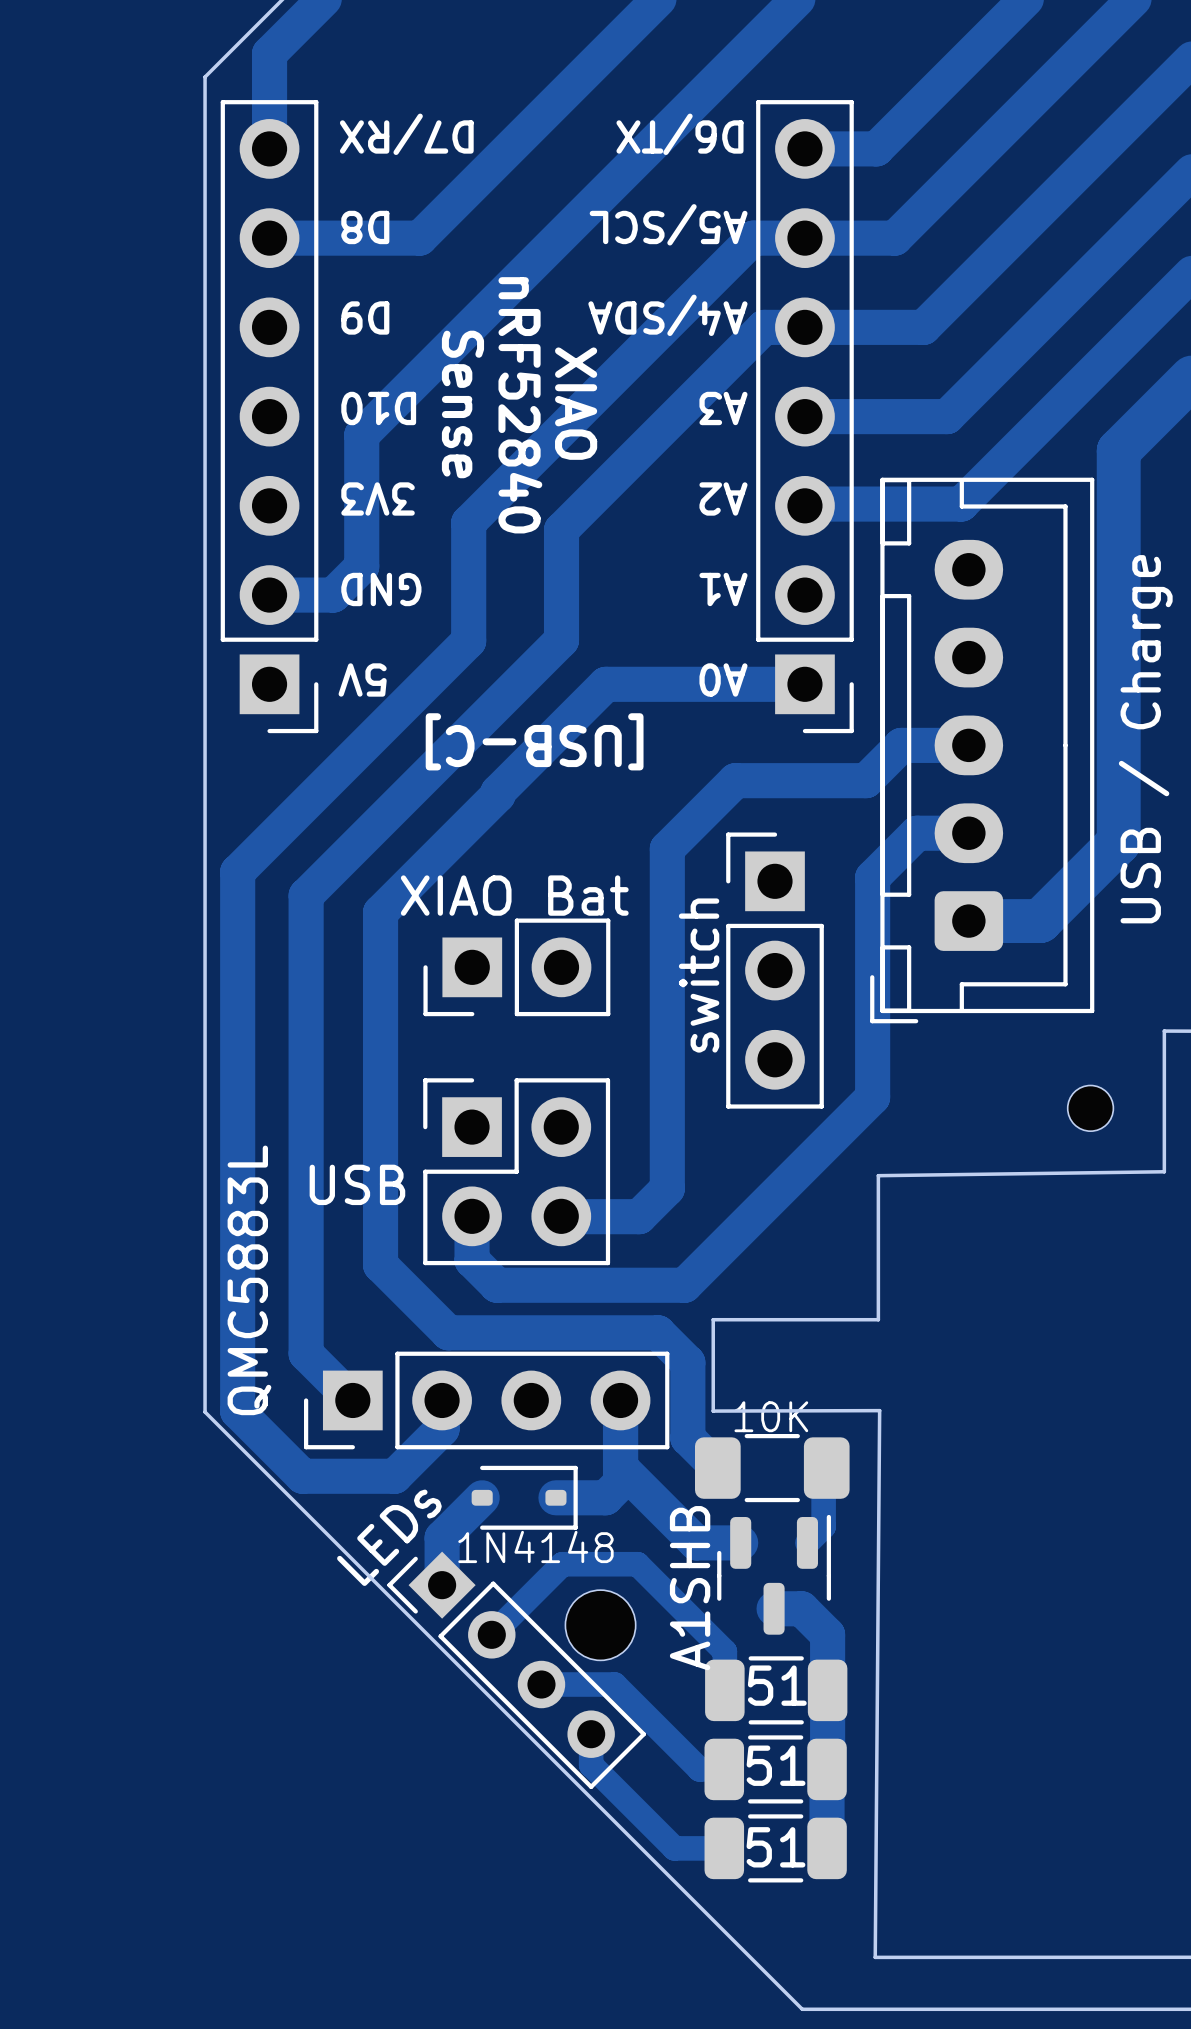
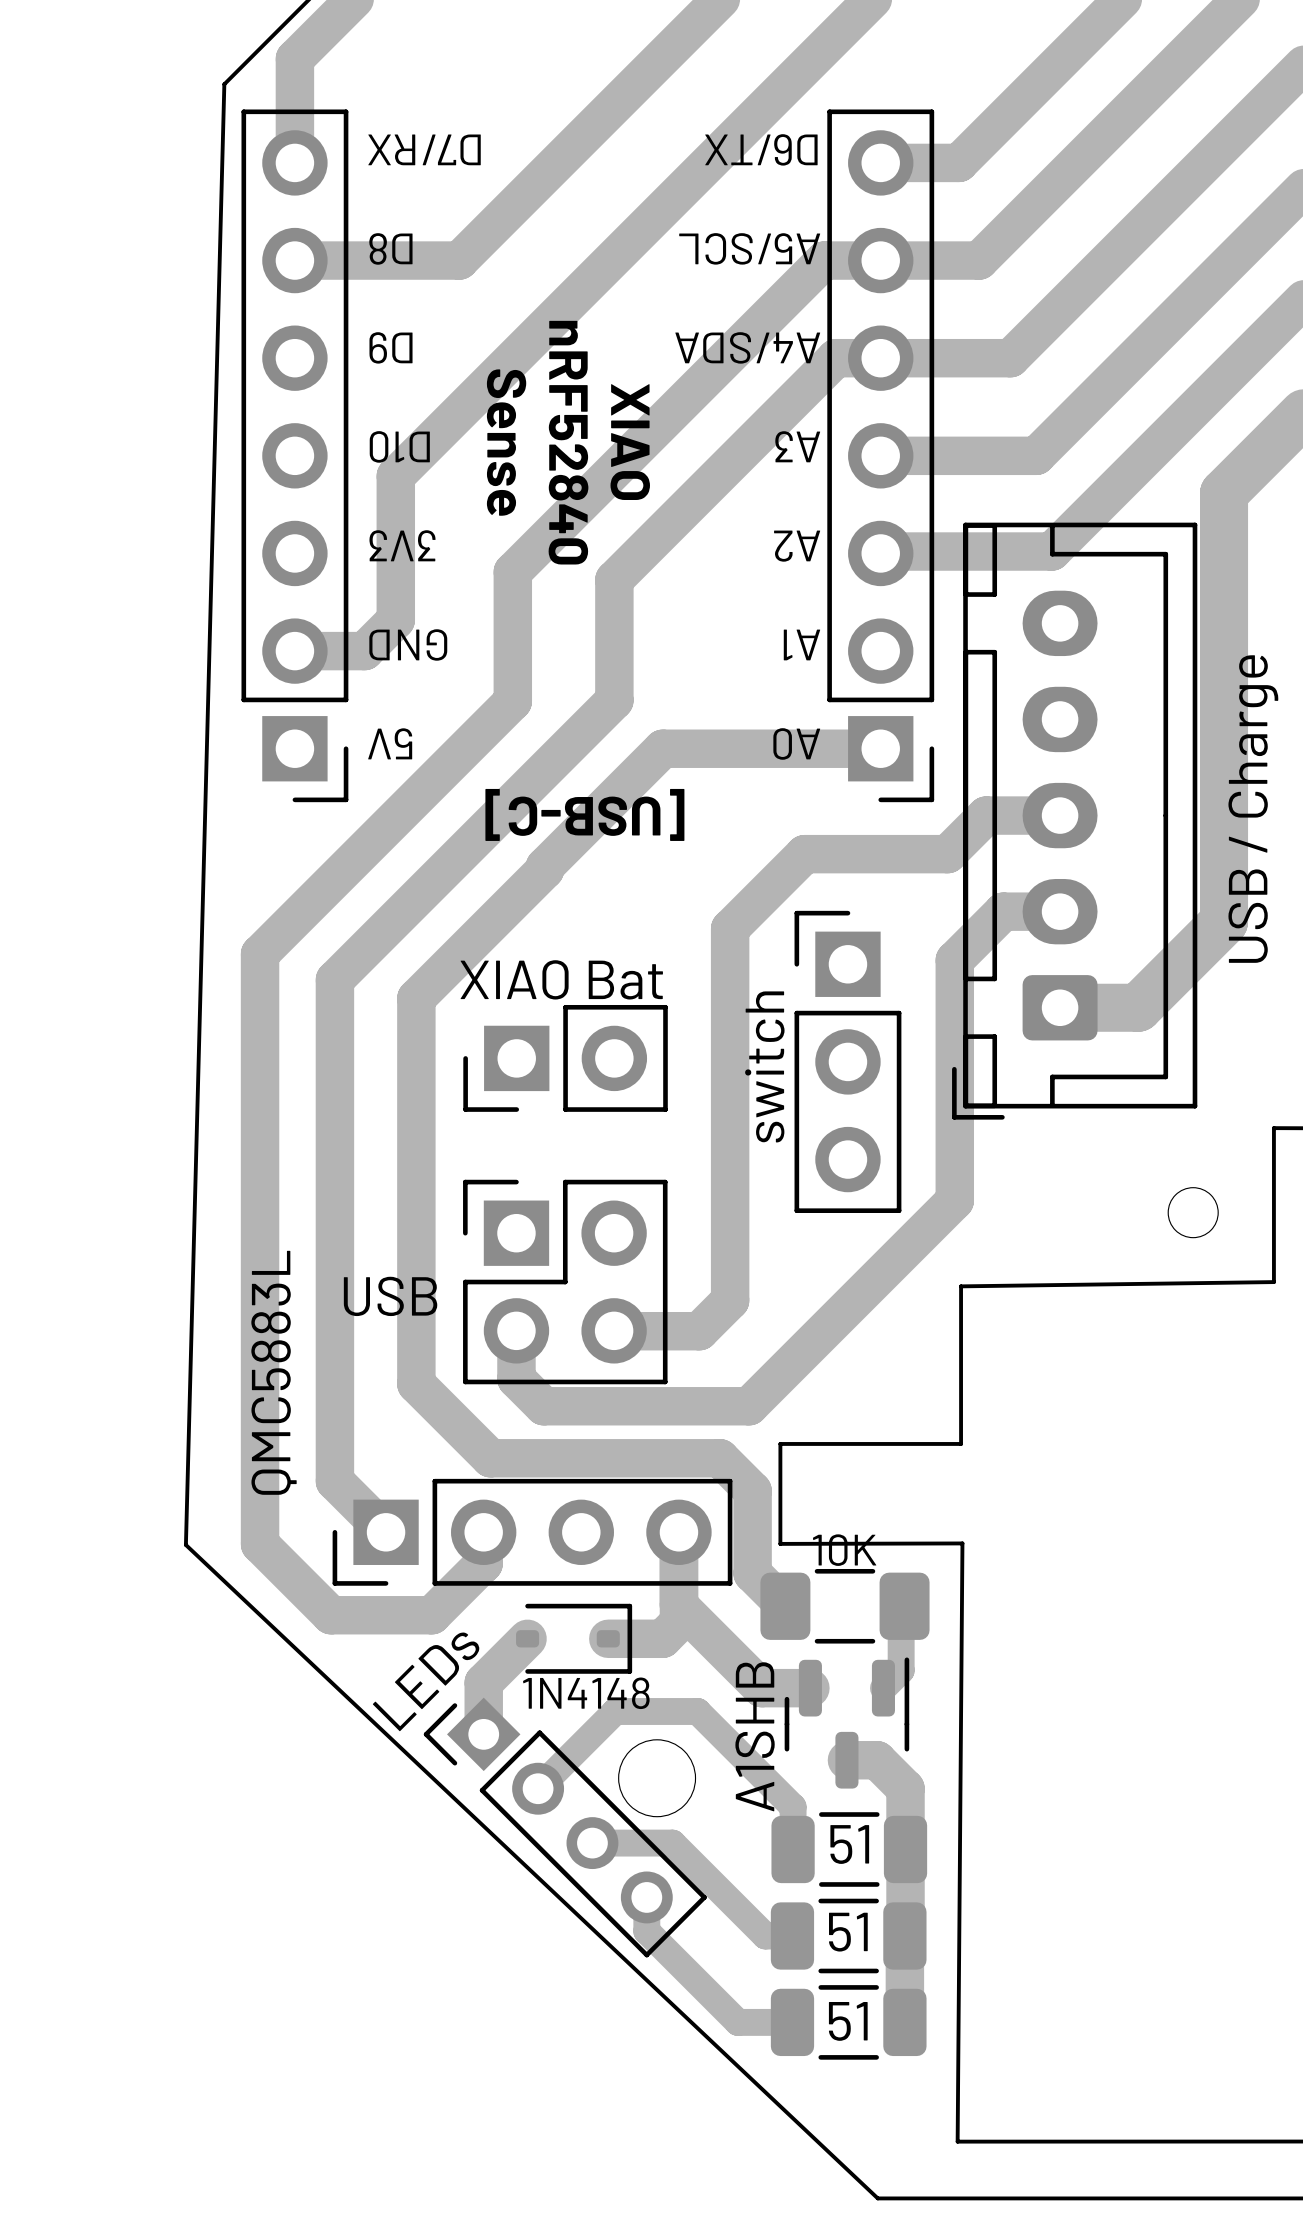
board edge: (205, 77) (205, 1412) (802, 2009) -> (224, 84) (185, 1544) (877, 2198)

